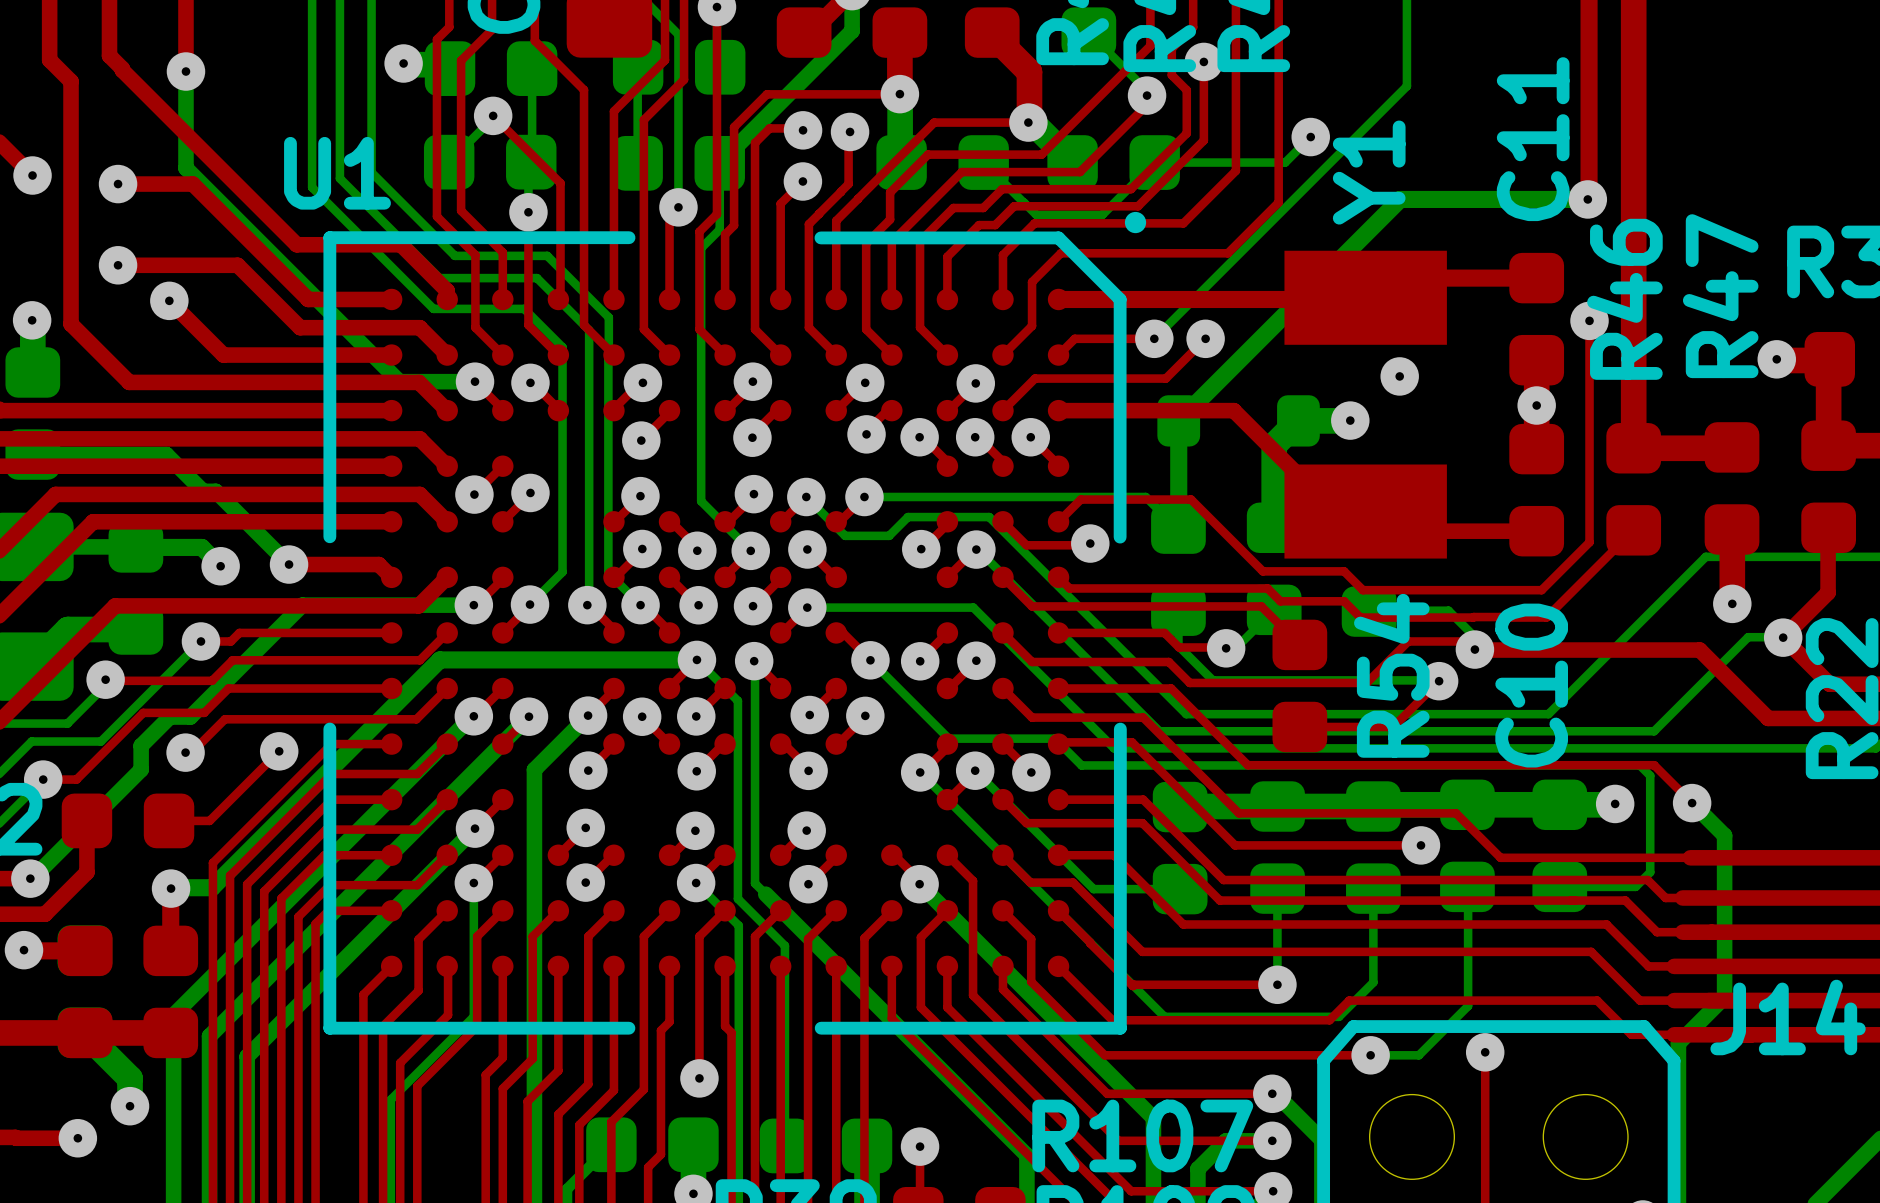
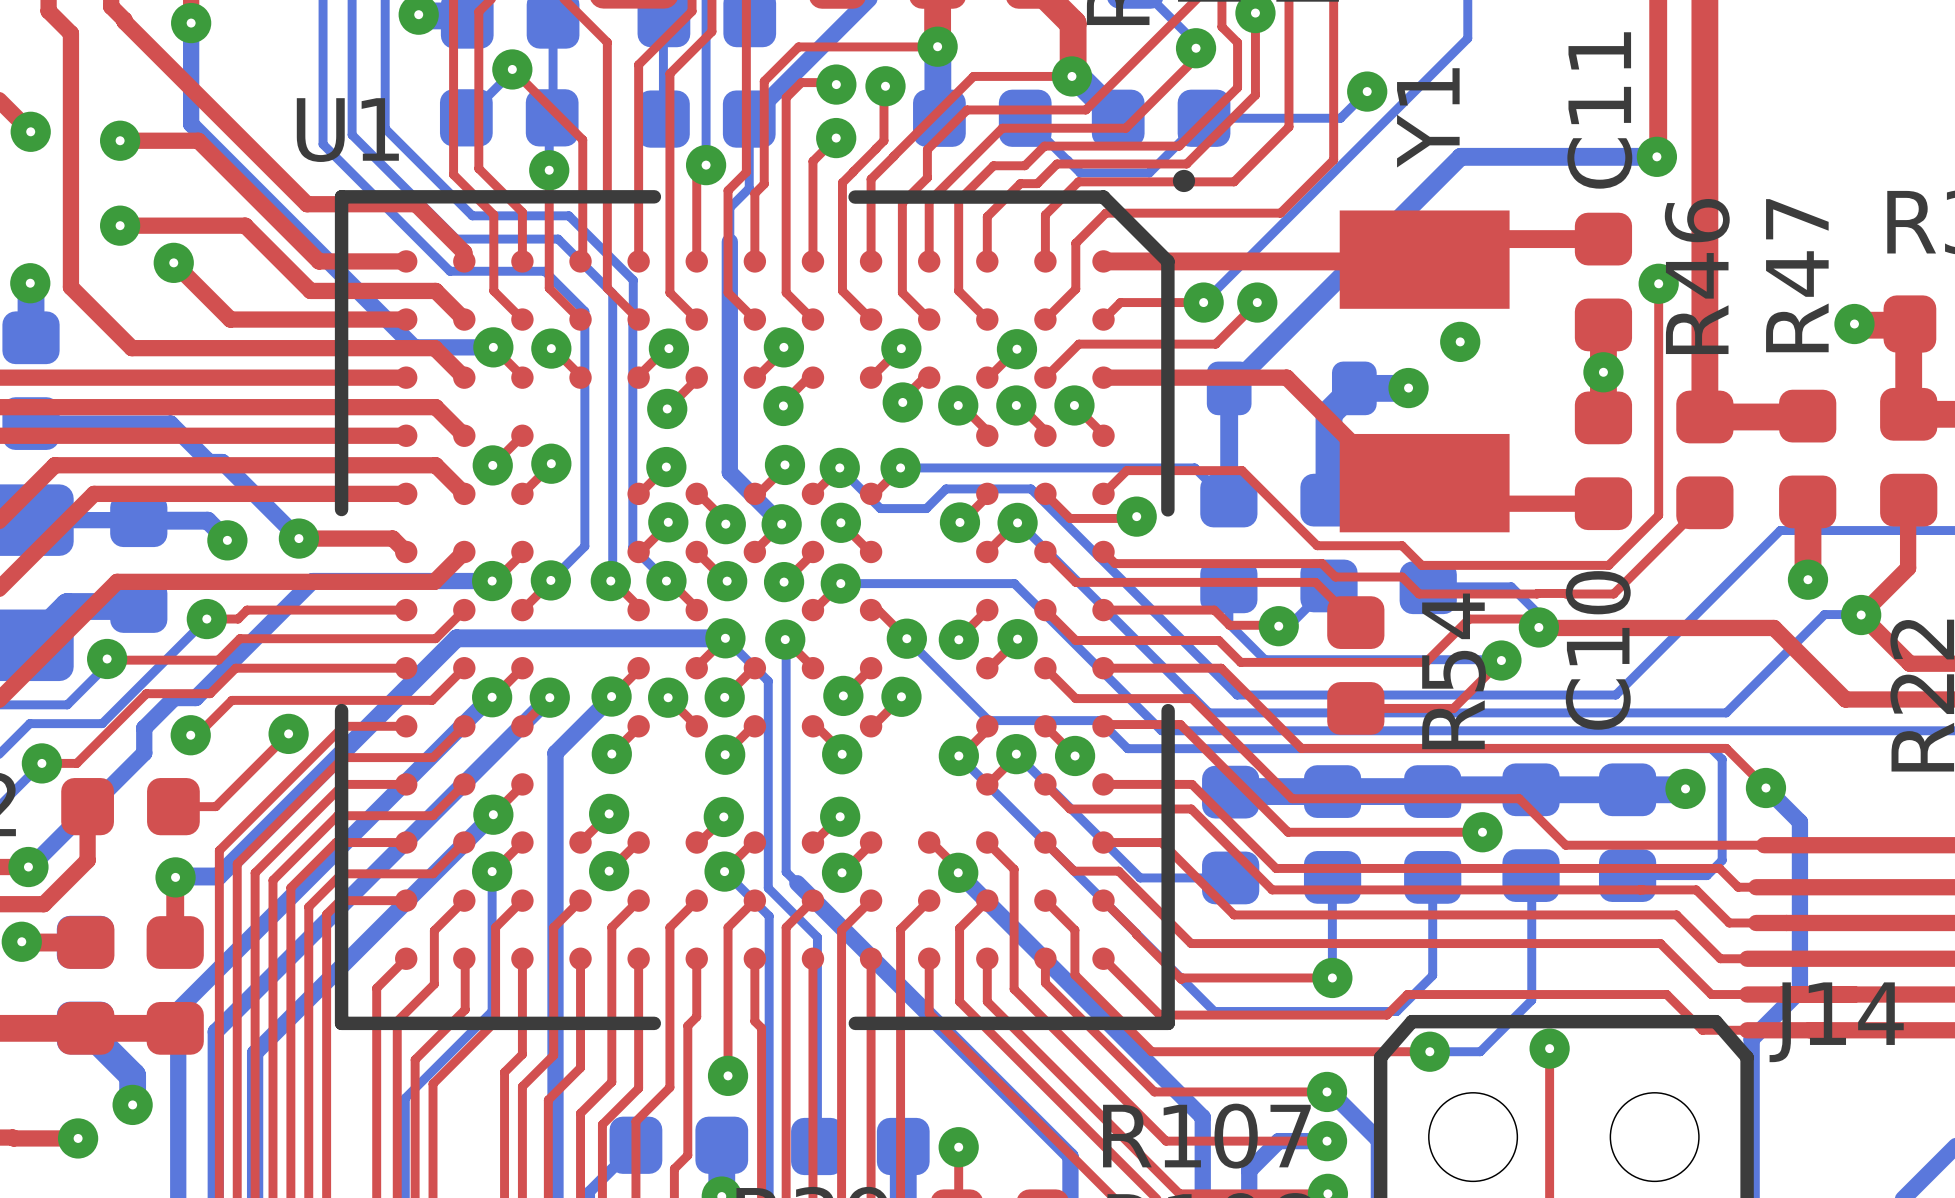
bottom track width: thin (701, 280) (701, 501) (750, 550) -> thick (729, 241) (729, 472) (781, 524)

